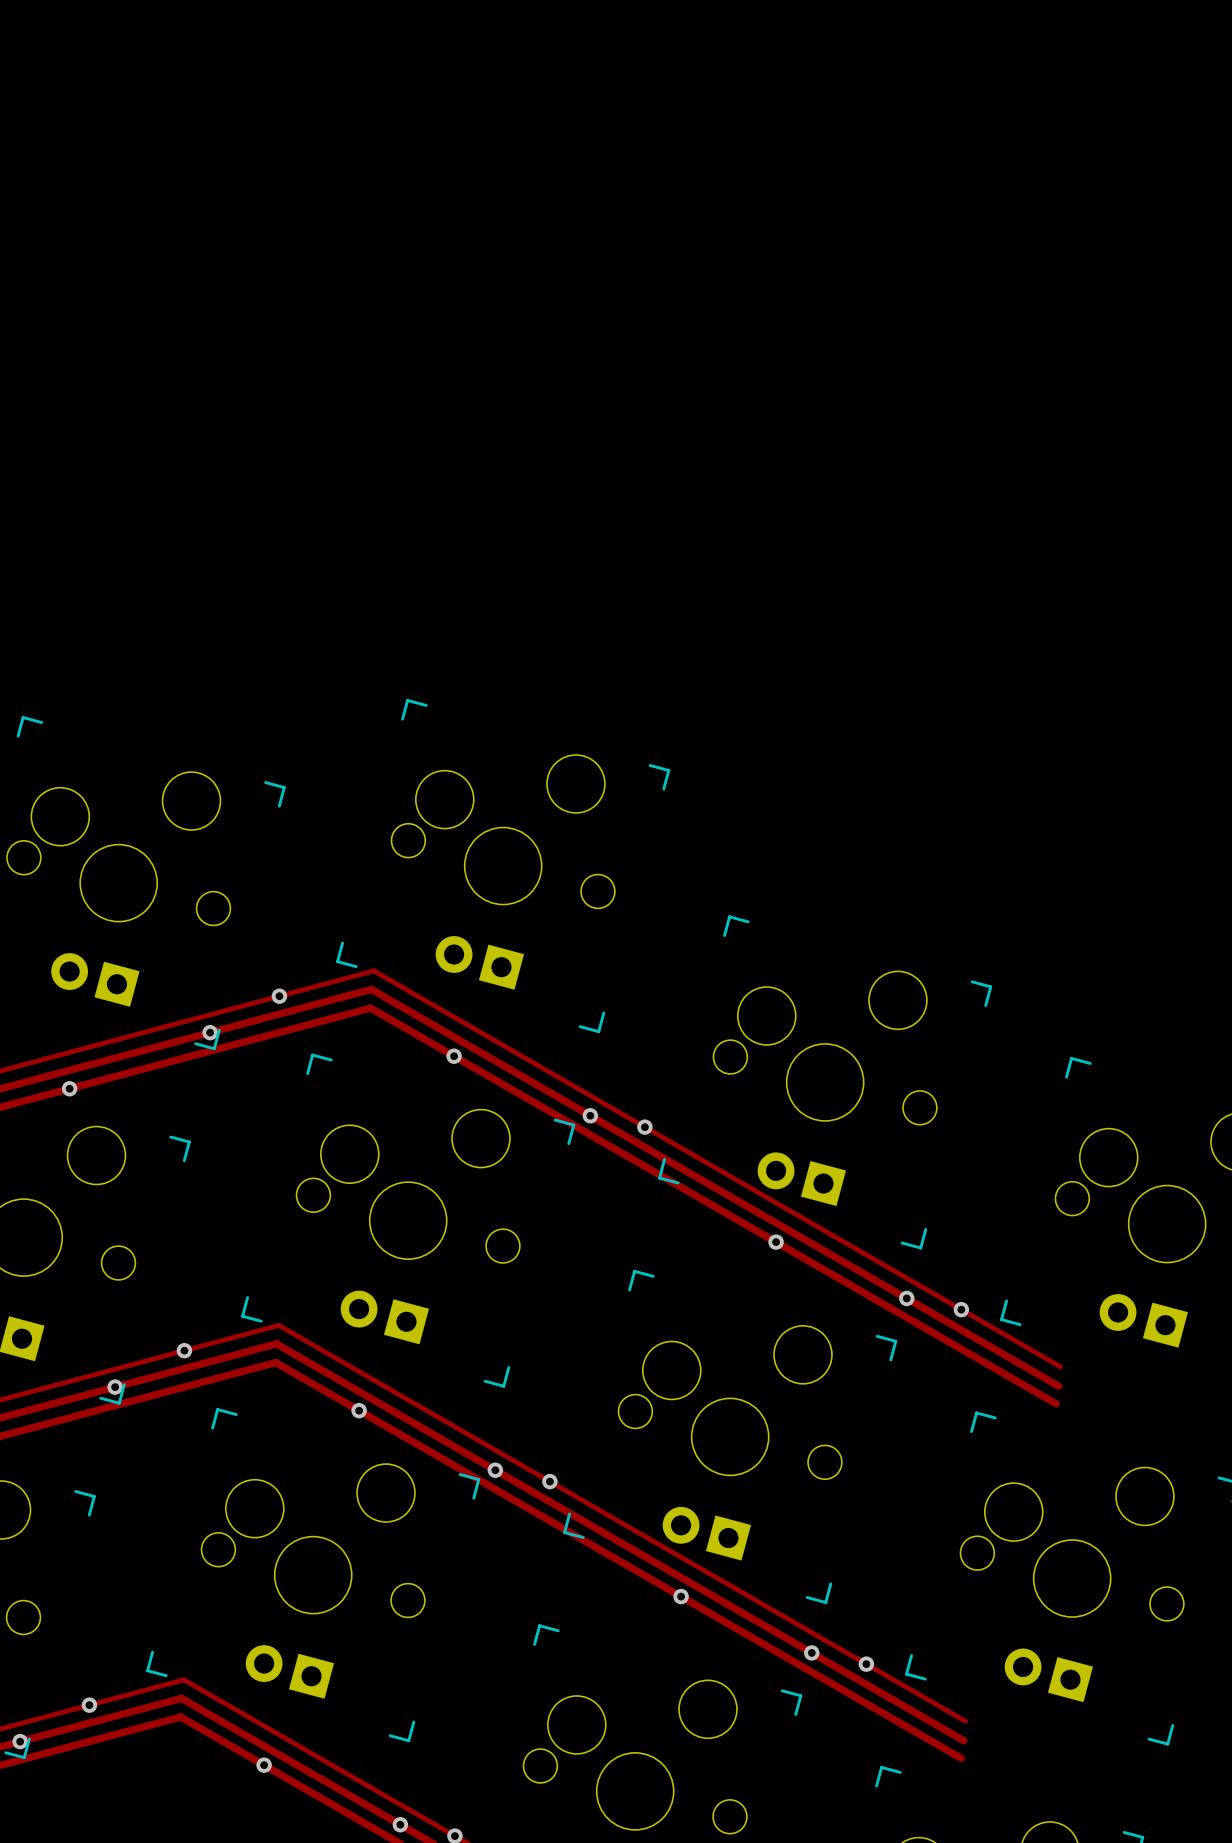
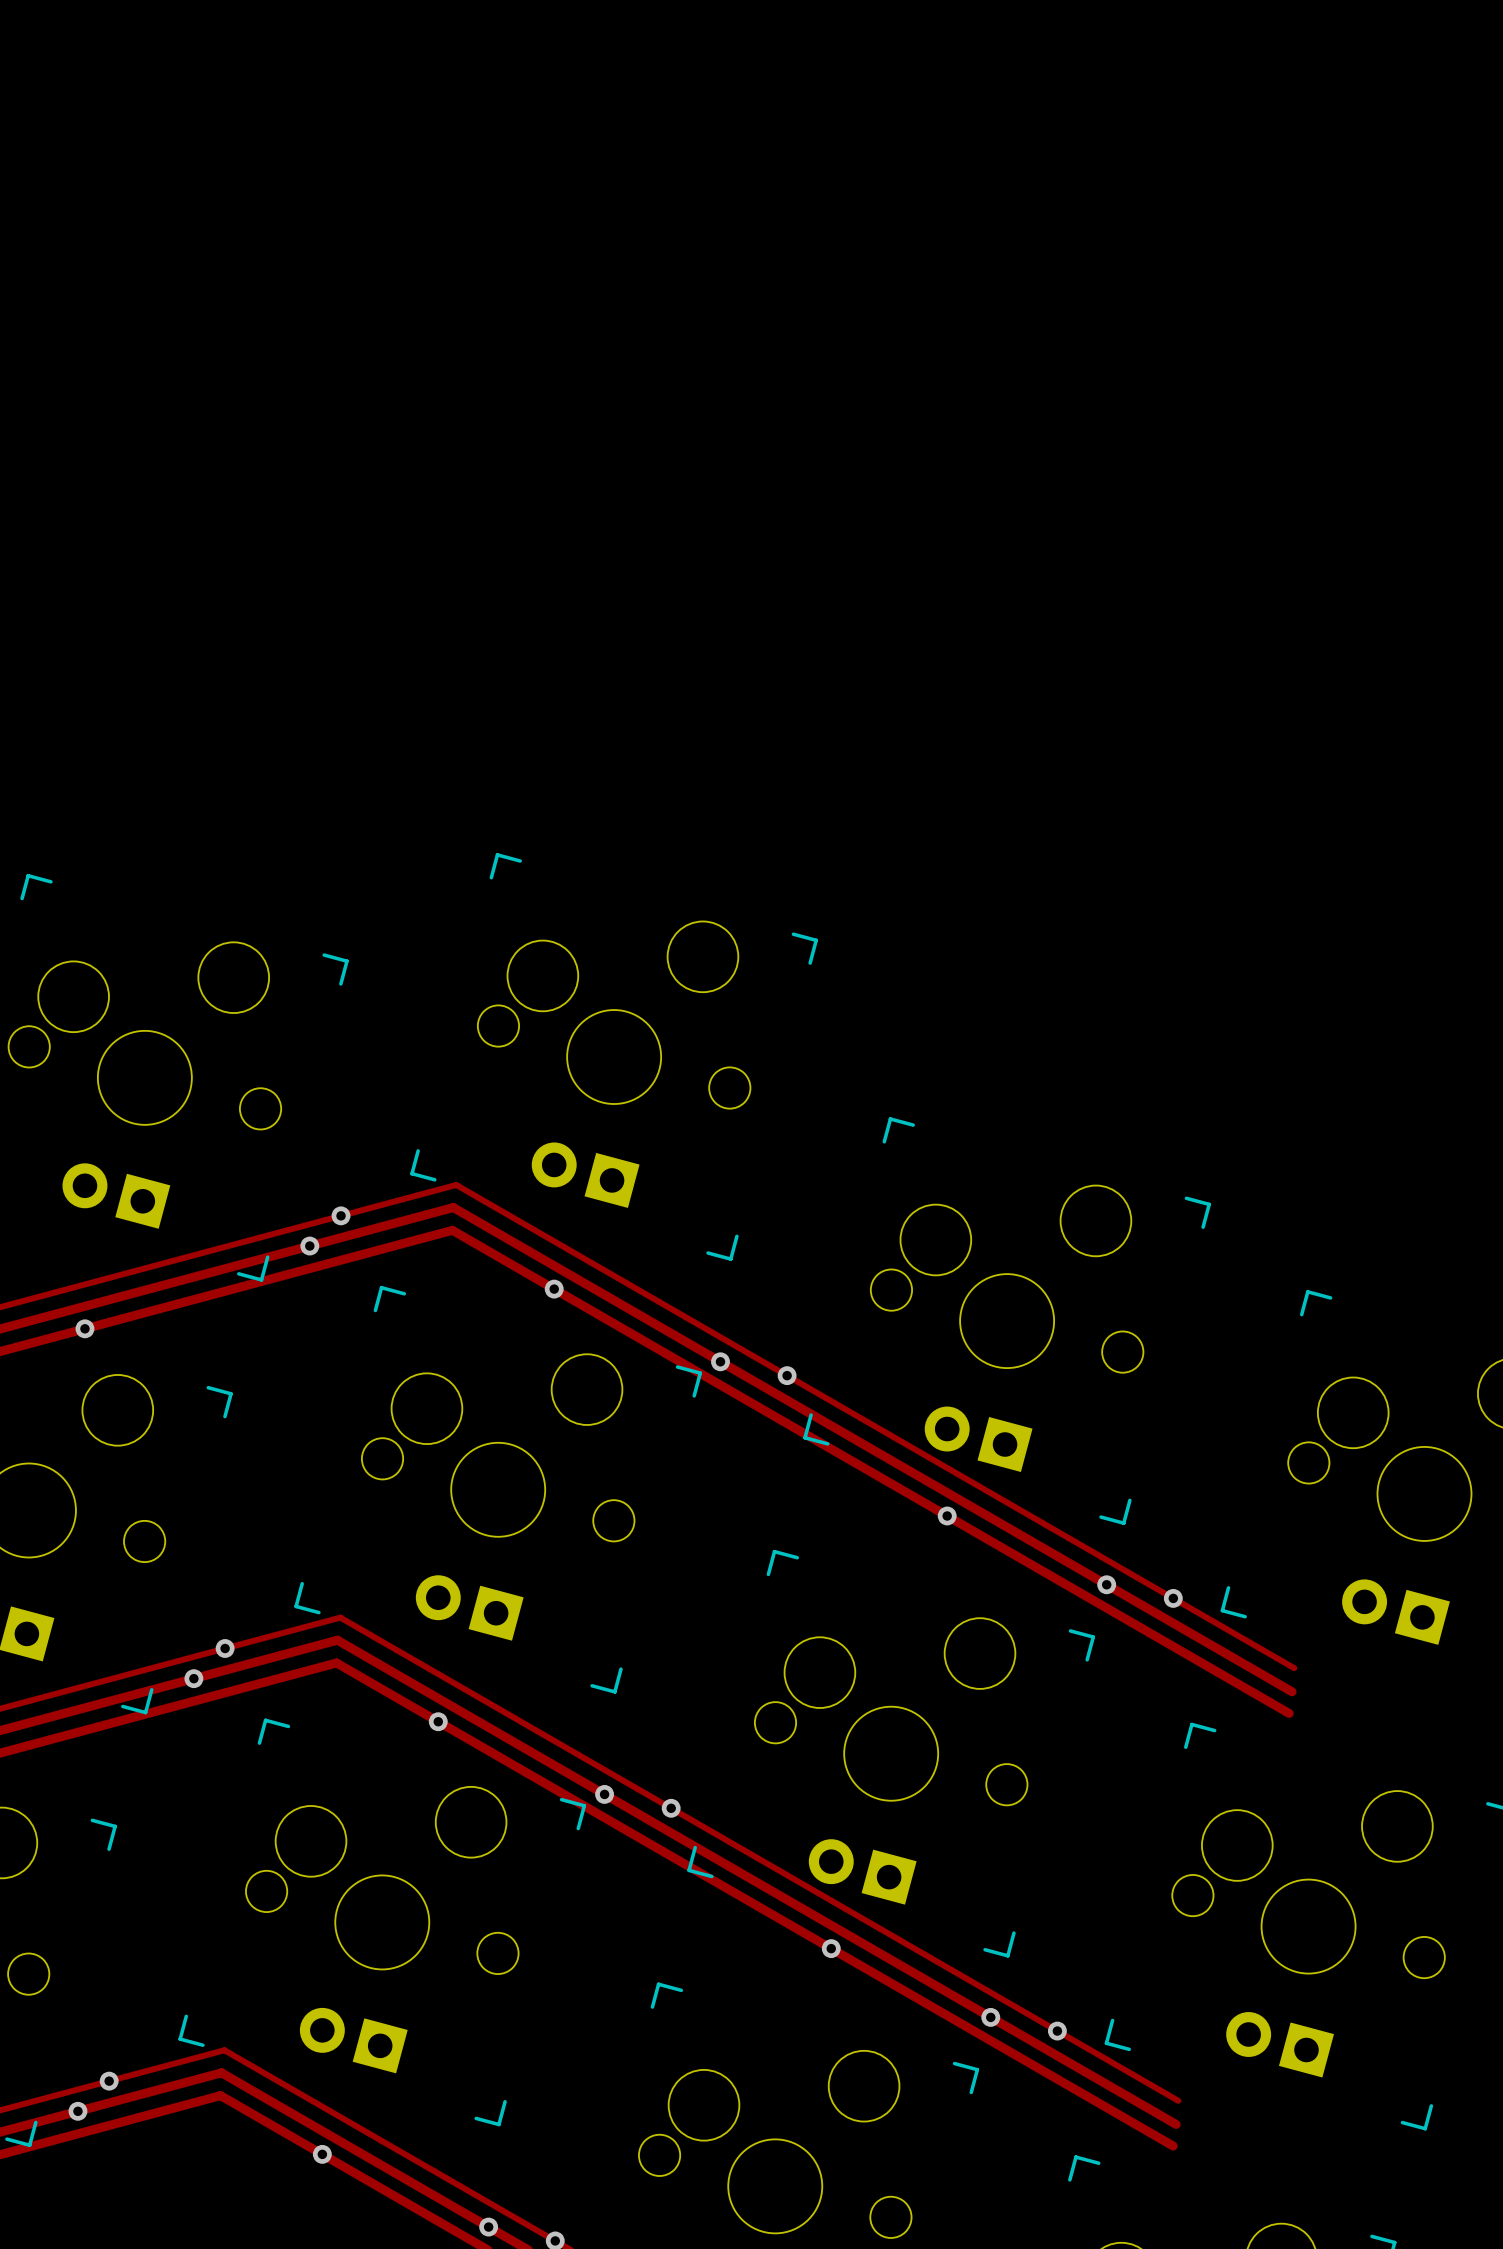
via position: (210, 1032) -> (309, 1246)
via position: (115, 1387) -> (193, 1678)
via position: (20, 1741) -> (77, 2111)

